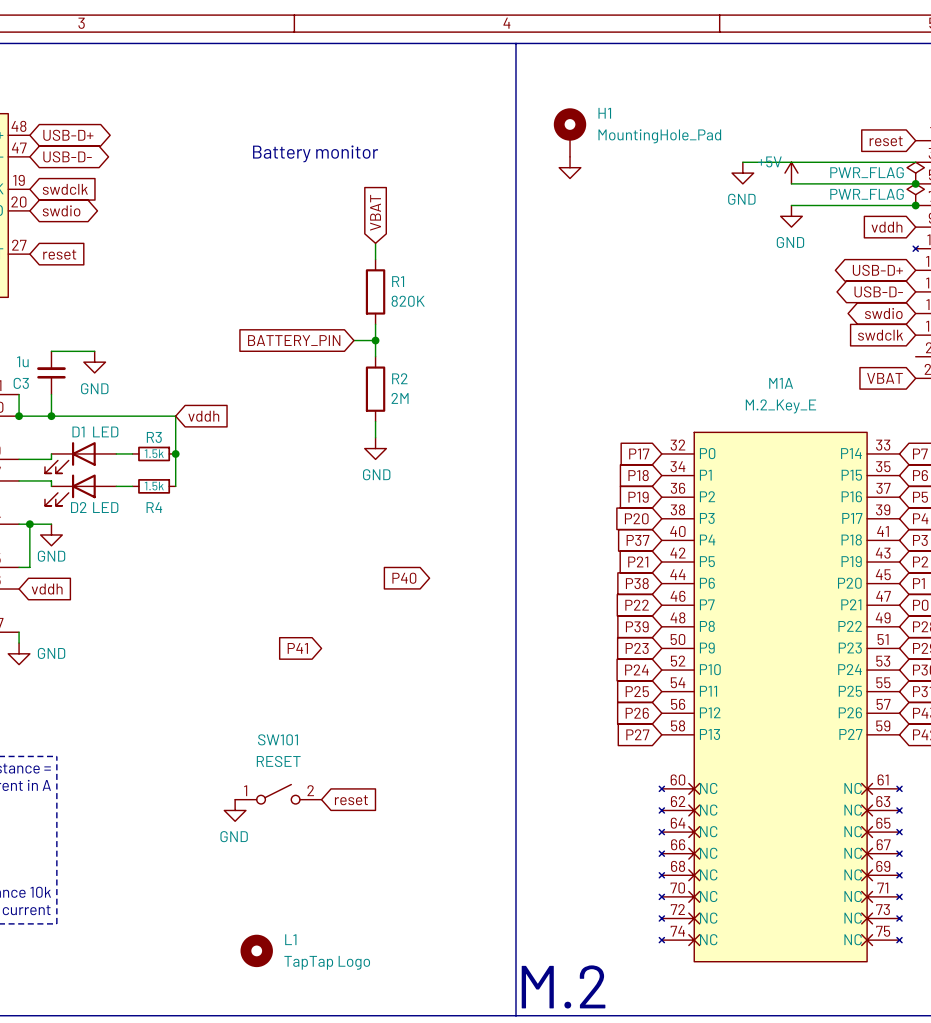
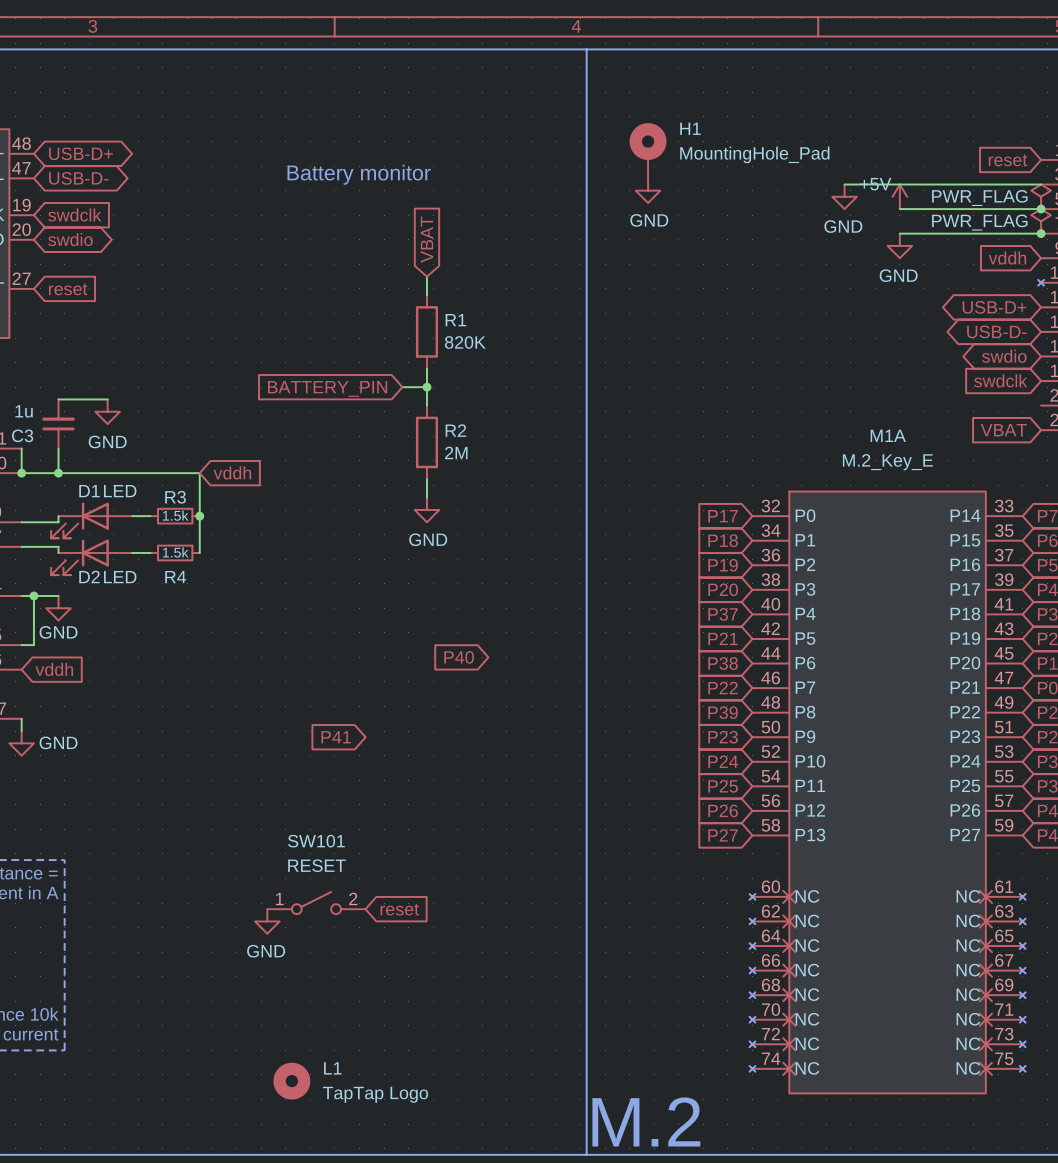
power symbol text: none -> GND (649, 220)

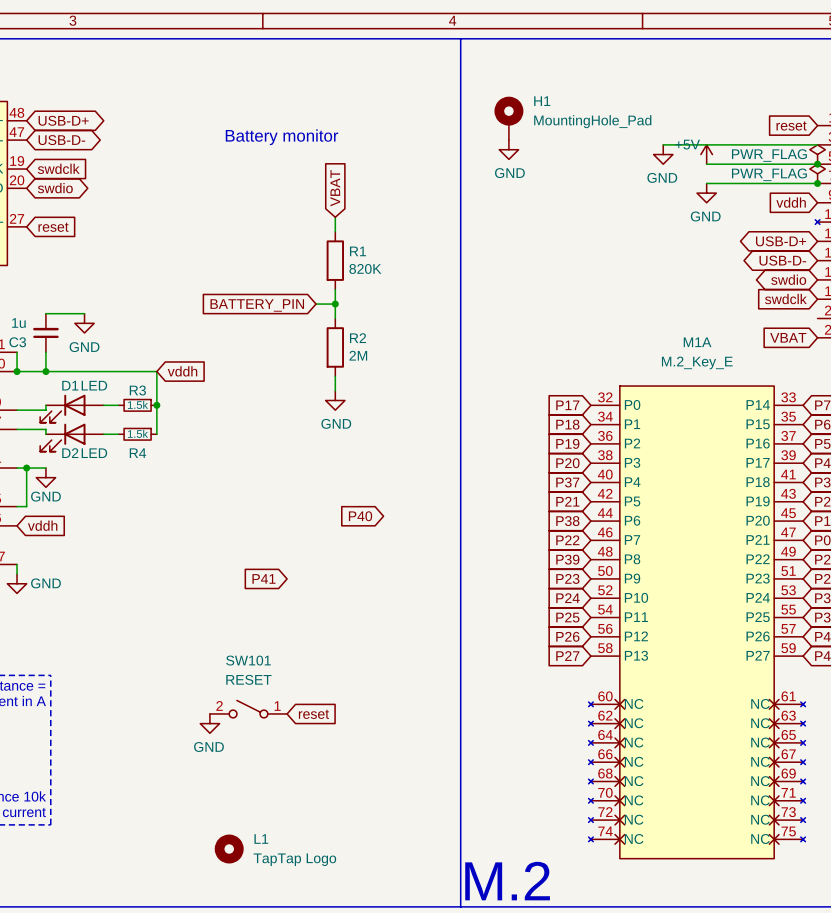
SW101 flip: as is (316, 903) -> left-right (248, 709)

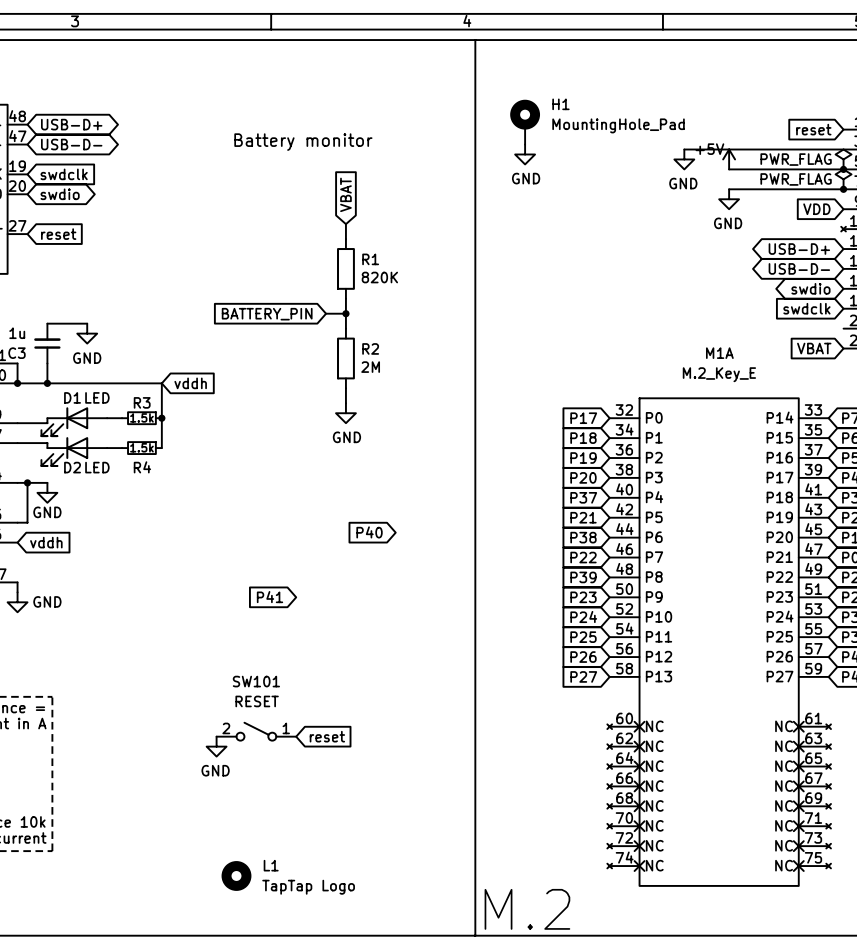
global label: vddh (791, 202) -> VDD (816, 209)

